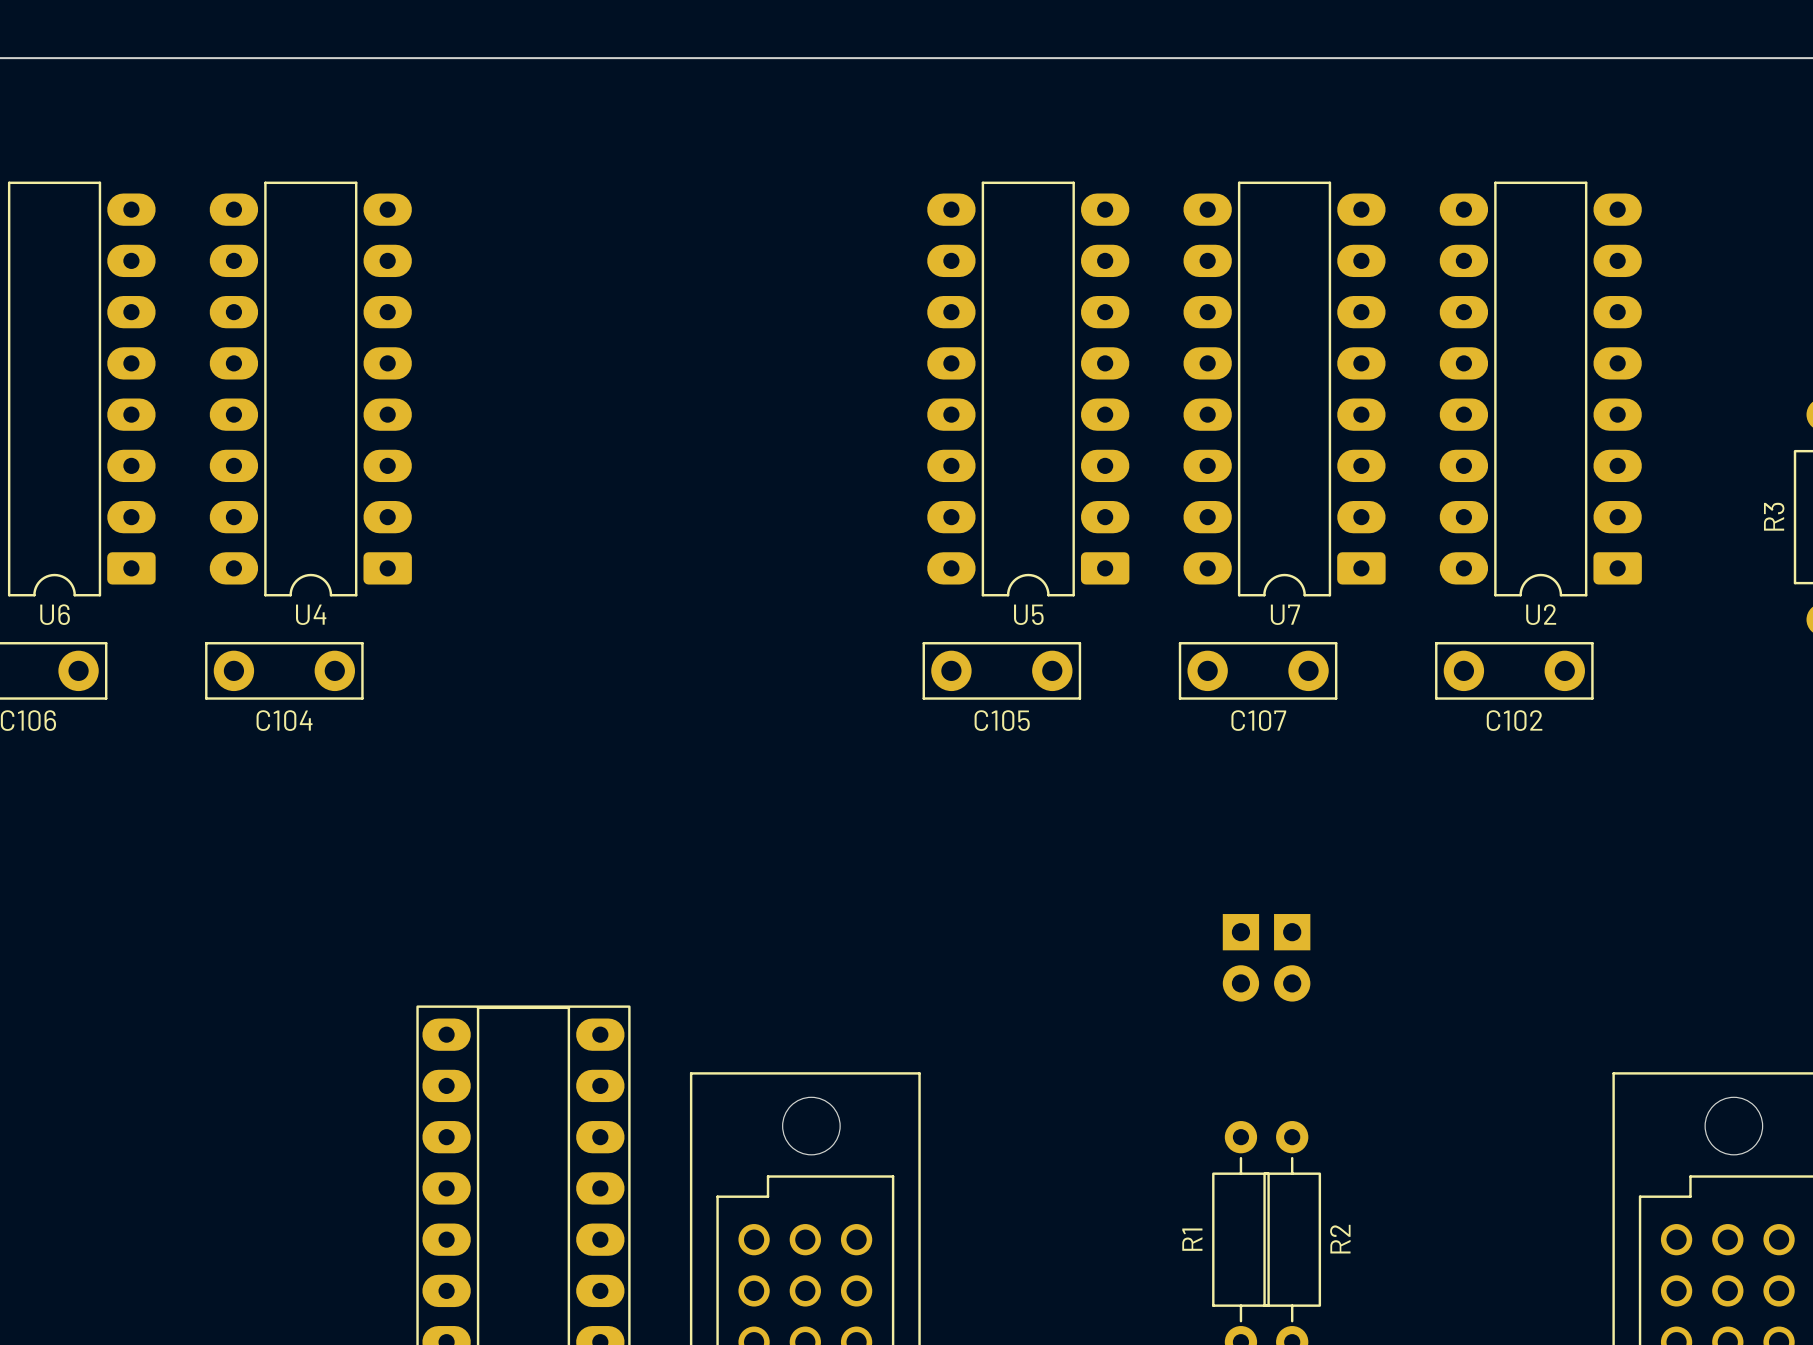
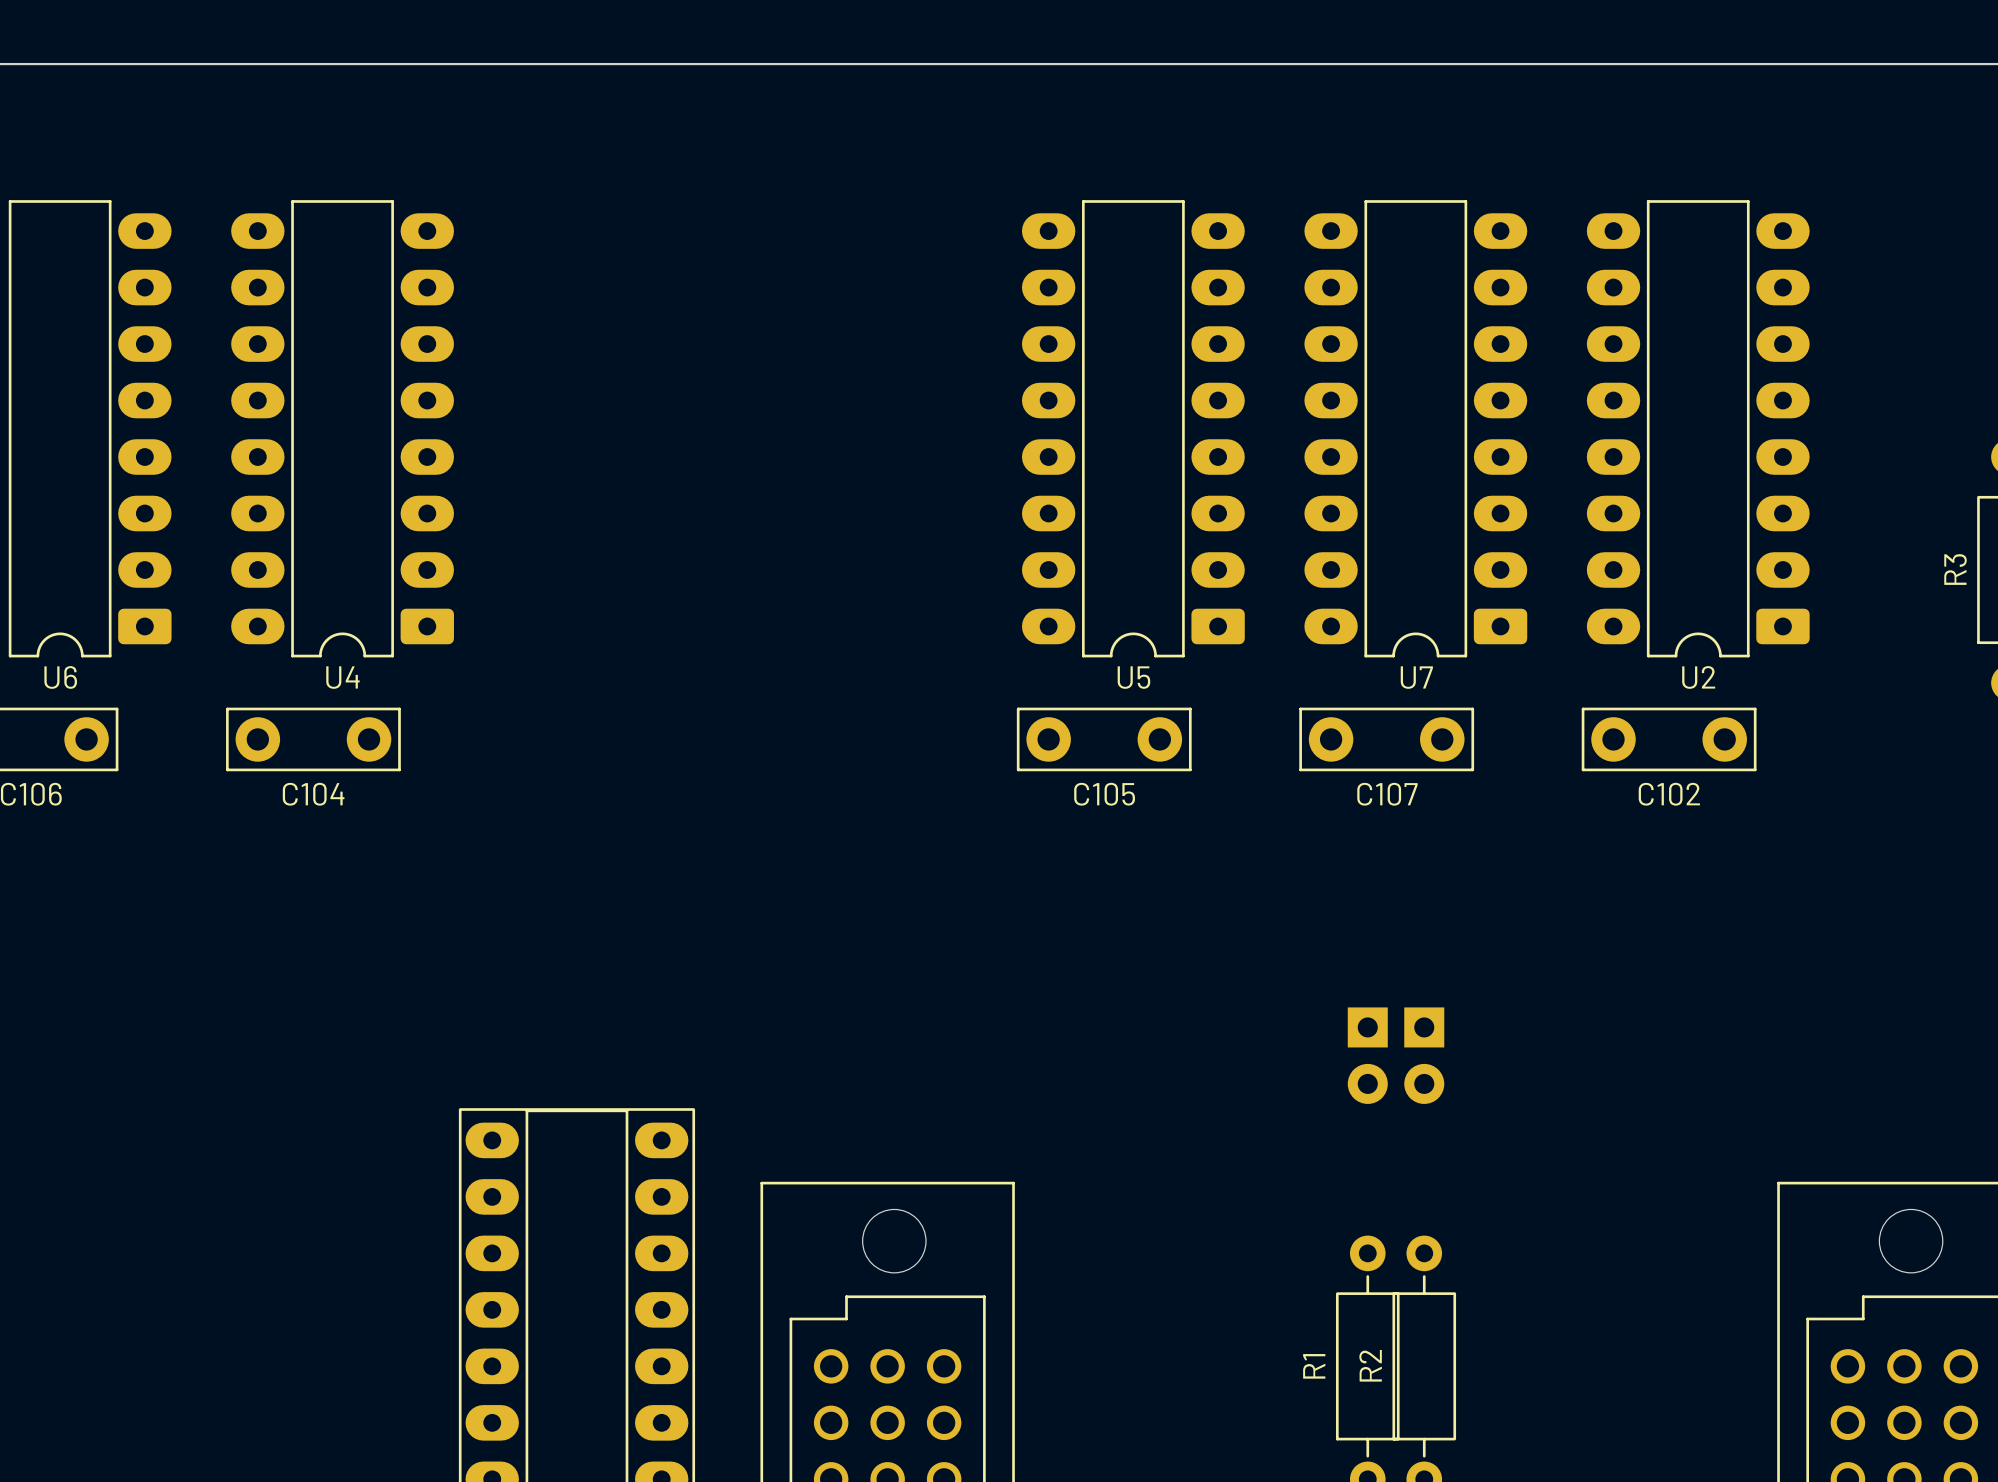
R2 name position: R2 (1340, 1239) -> R2 (1370, 1365)

